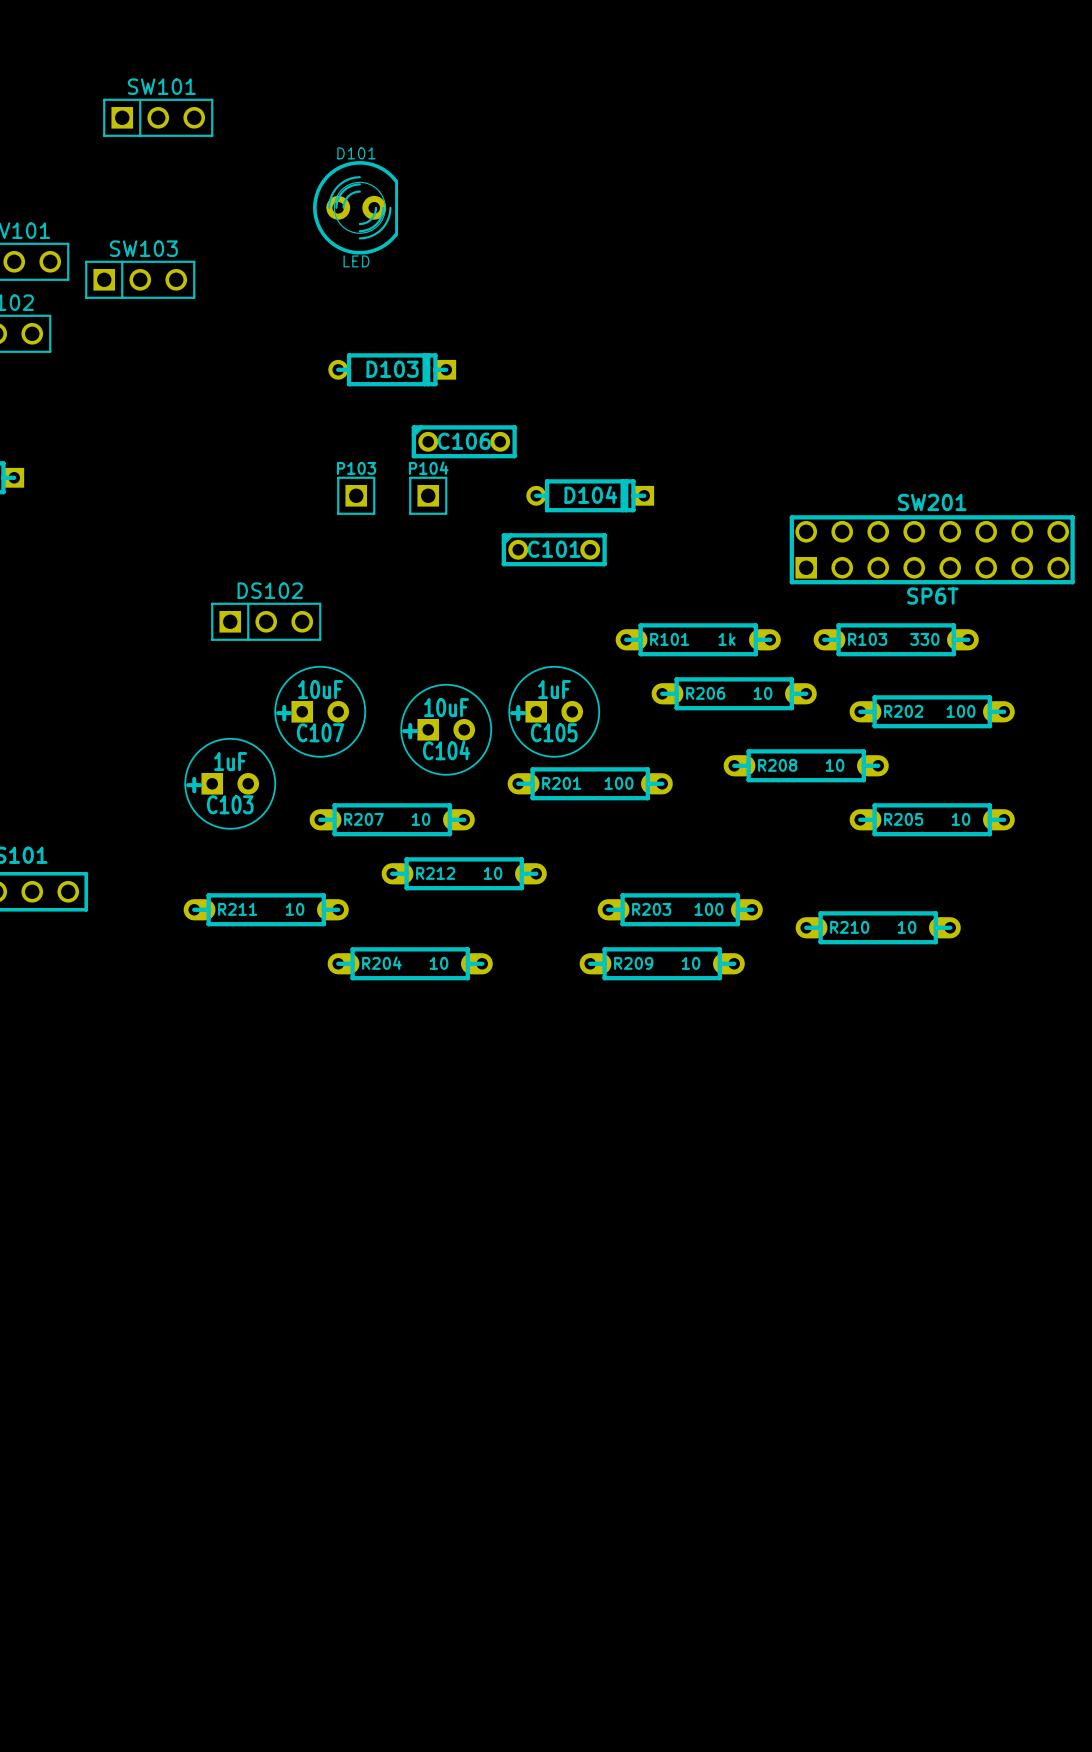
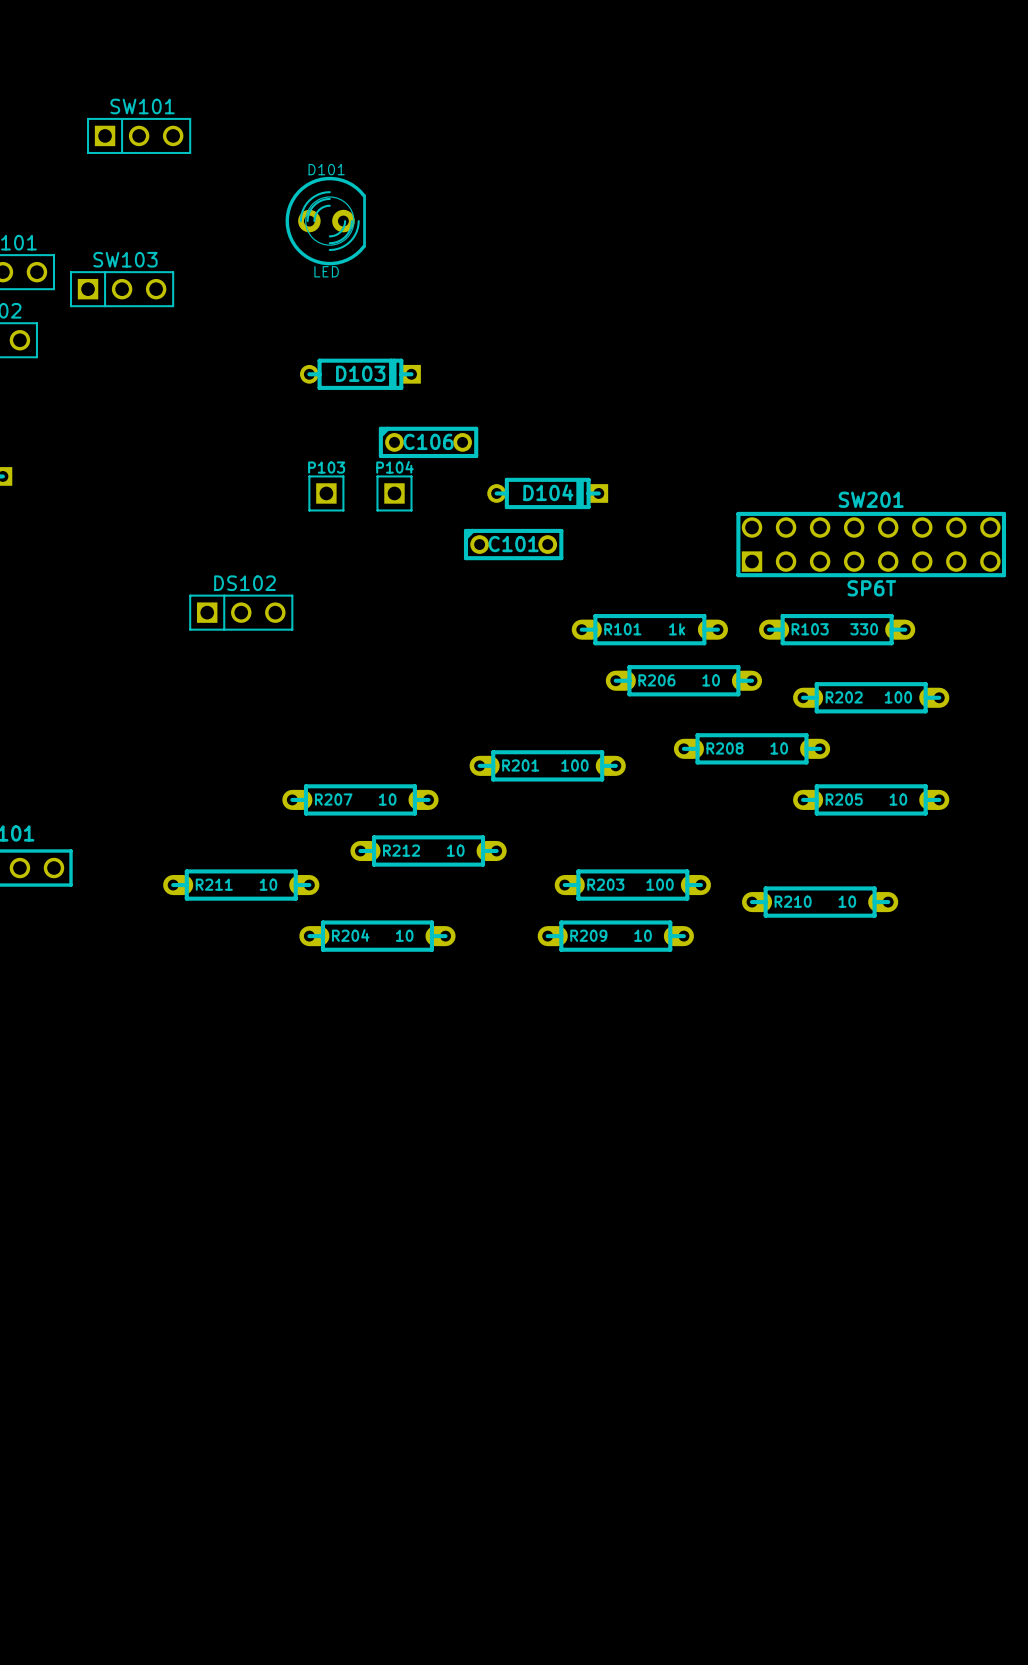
C107: 10uF (320, 711) -> none
C105: 1uF (554, 711) -> none
C104: 10uF (446, 729) -> none
C103: 1uF (230, 783) -> none

